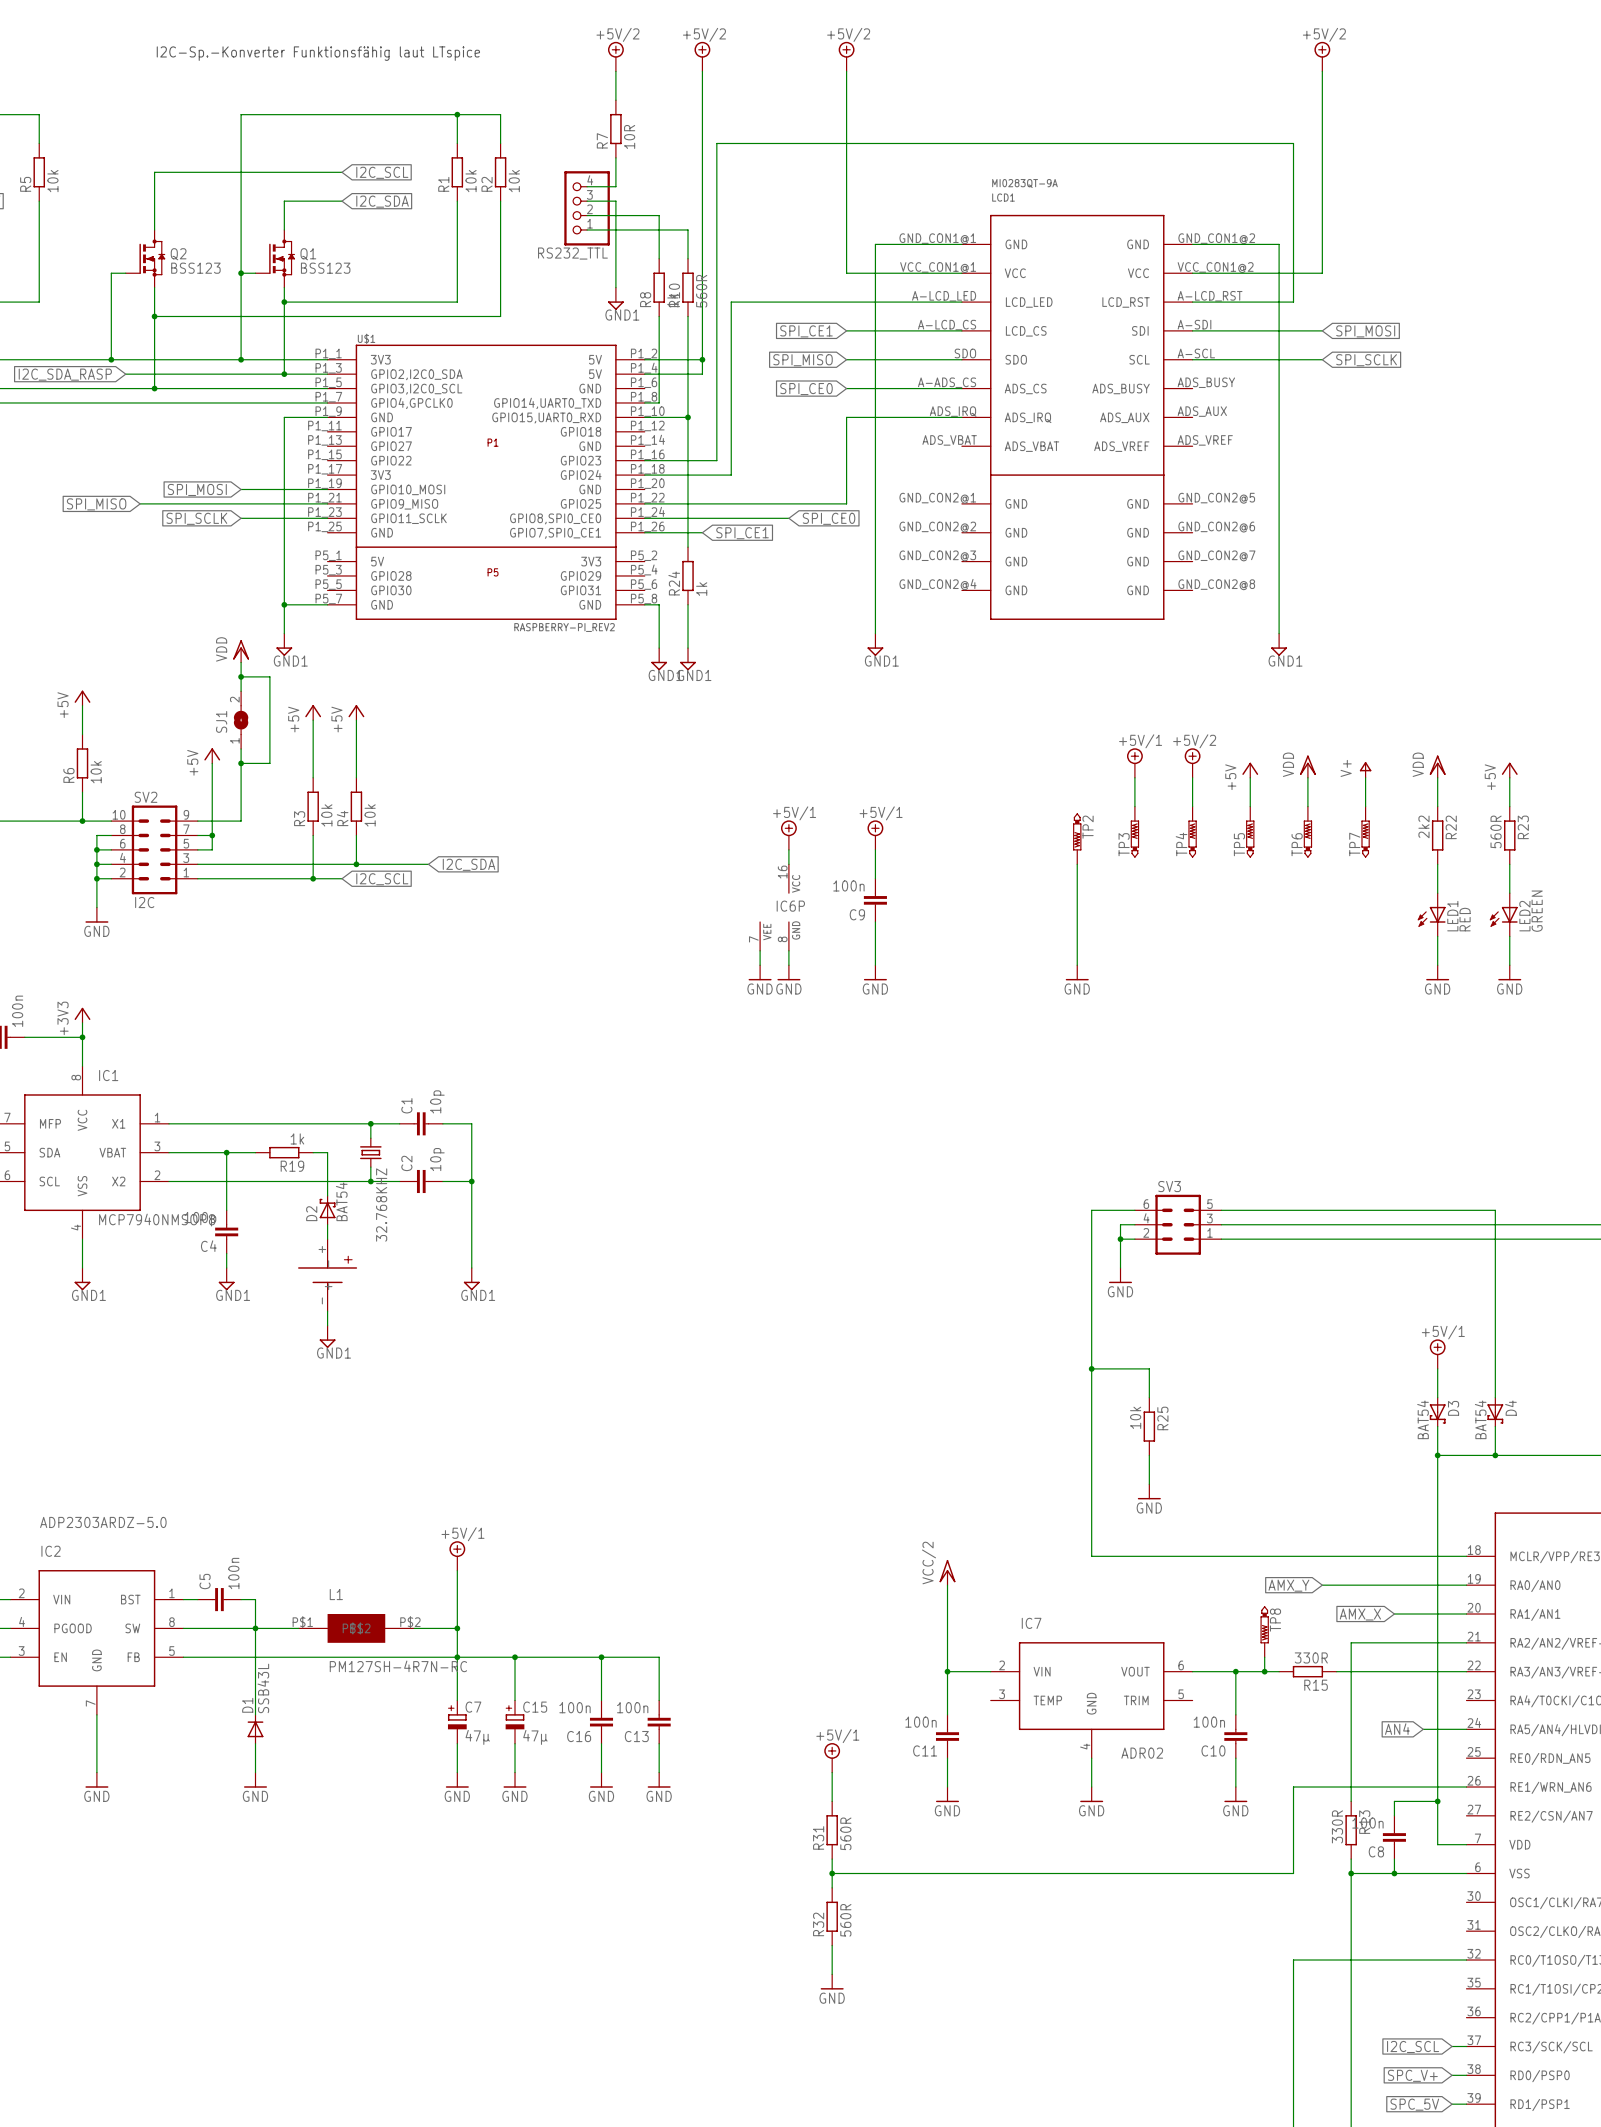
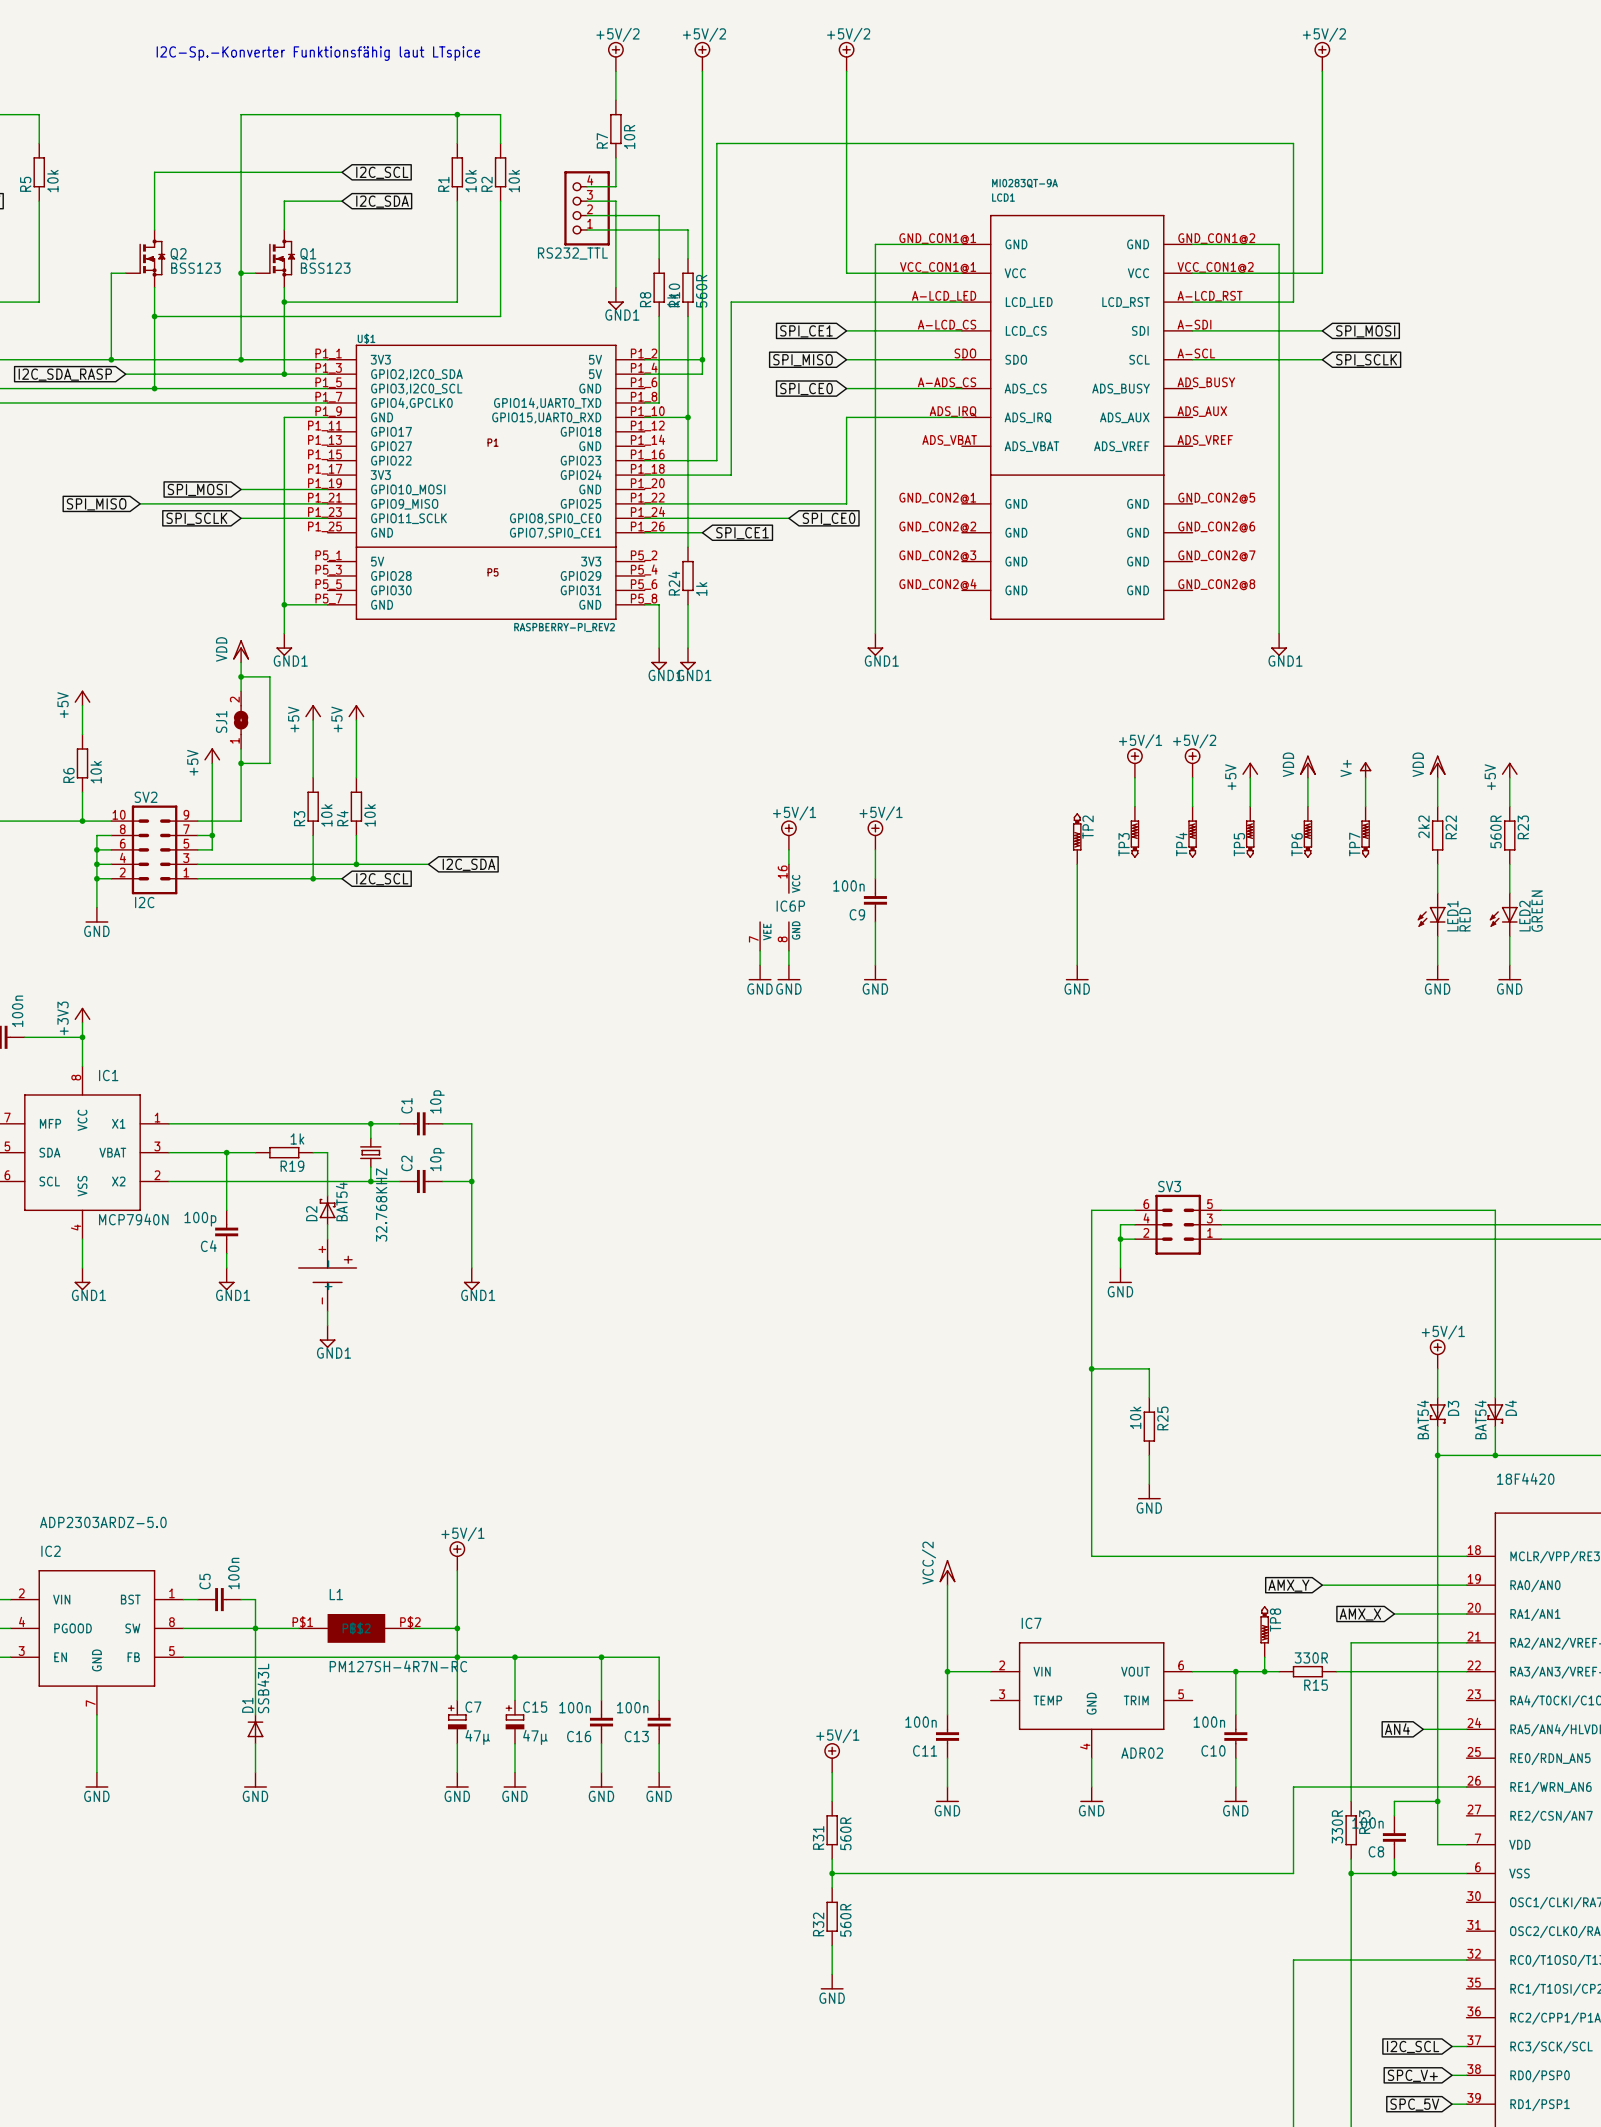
IC1 value: MCP7940NMSOP8 (157, 1219) -> MCP7940N (133, 1219)
part value: none -> 18F4420 (1525, 1478)

